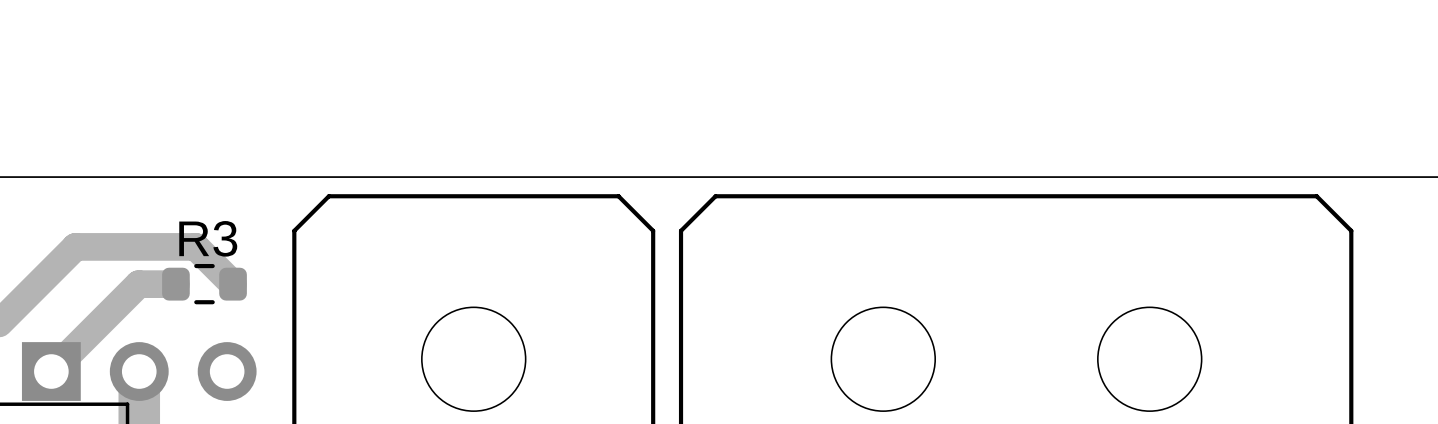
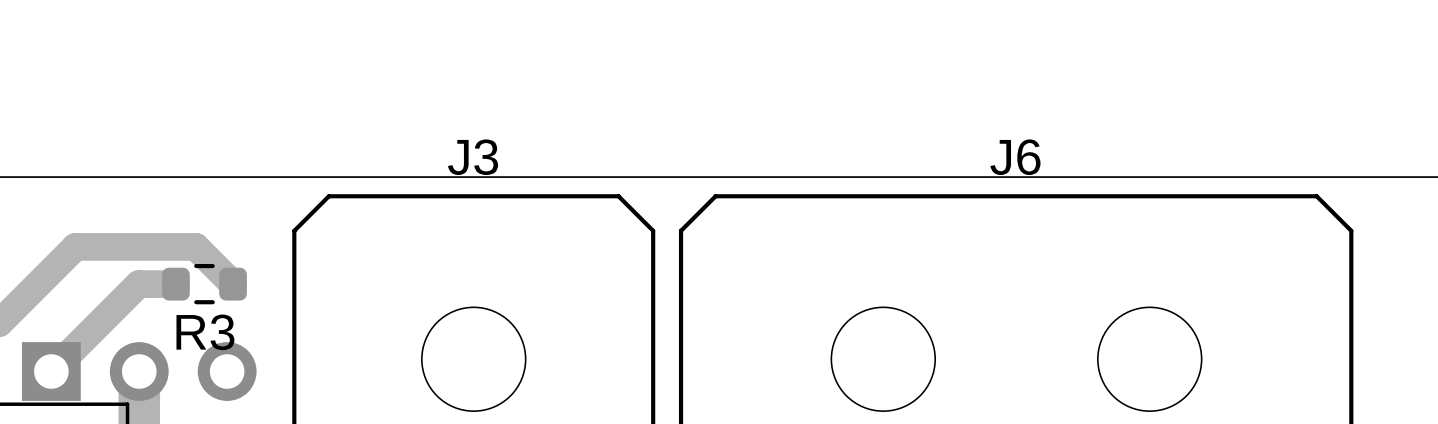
J3 name: none -> J3 (473, 157)
J6 name: none -> J6 (1015, 157)
R3 name position: R3 (208, 238) -> R3 (205, 332)

